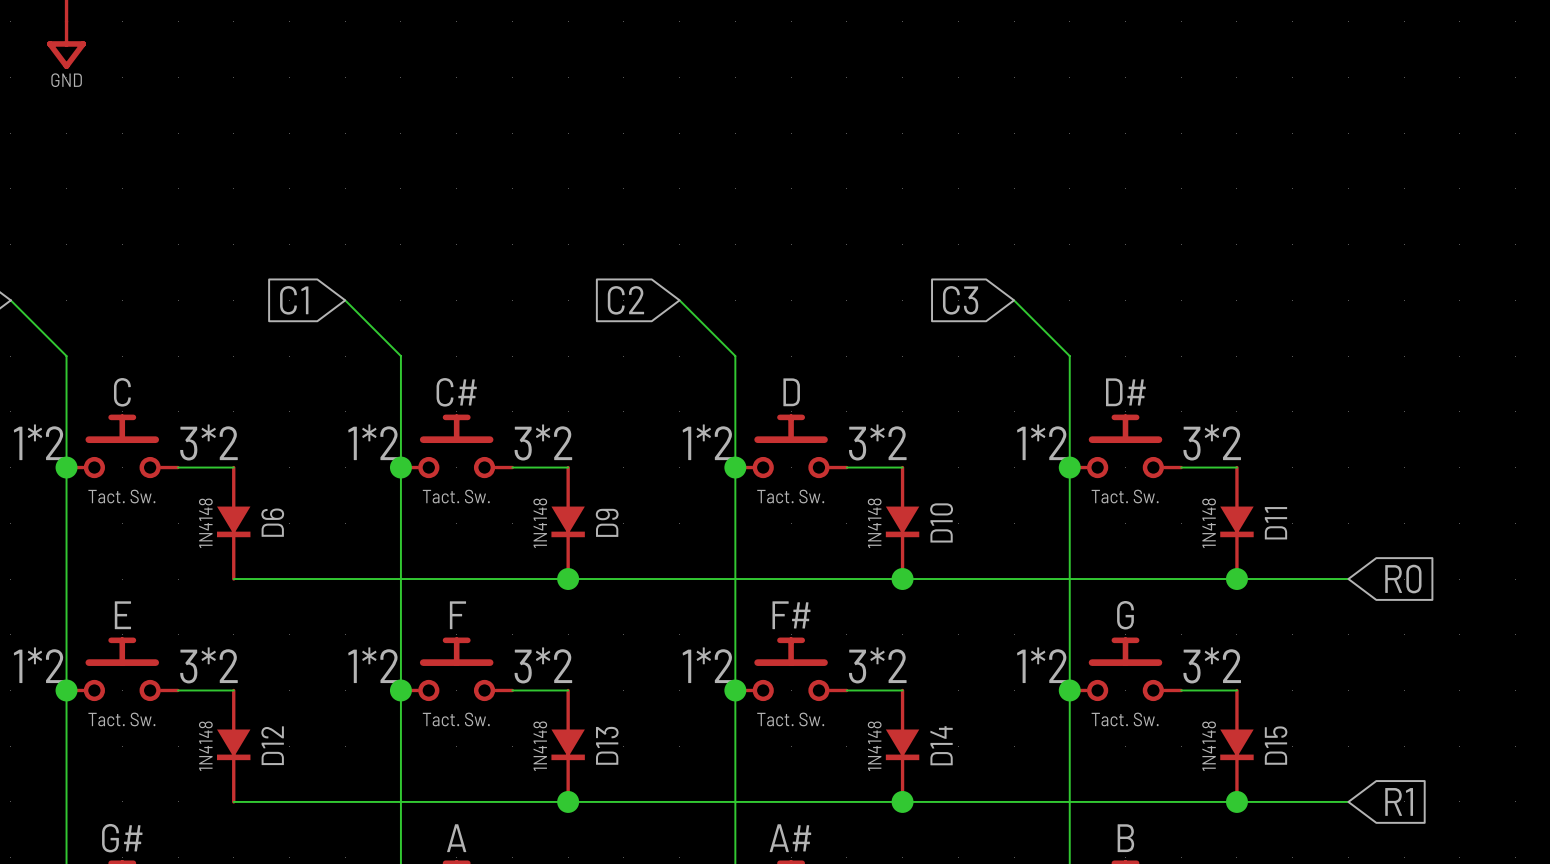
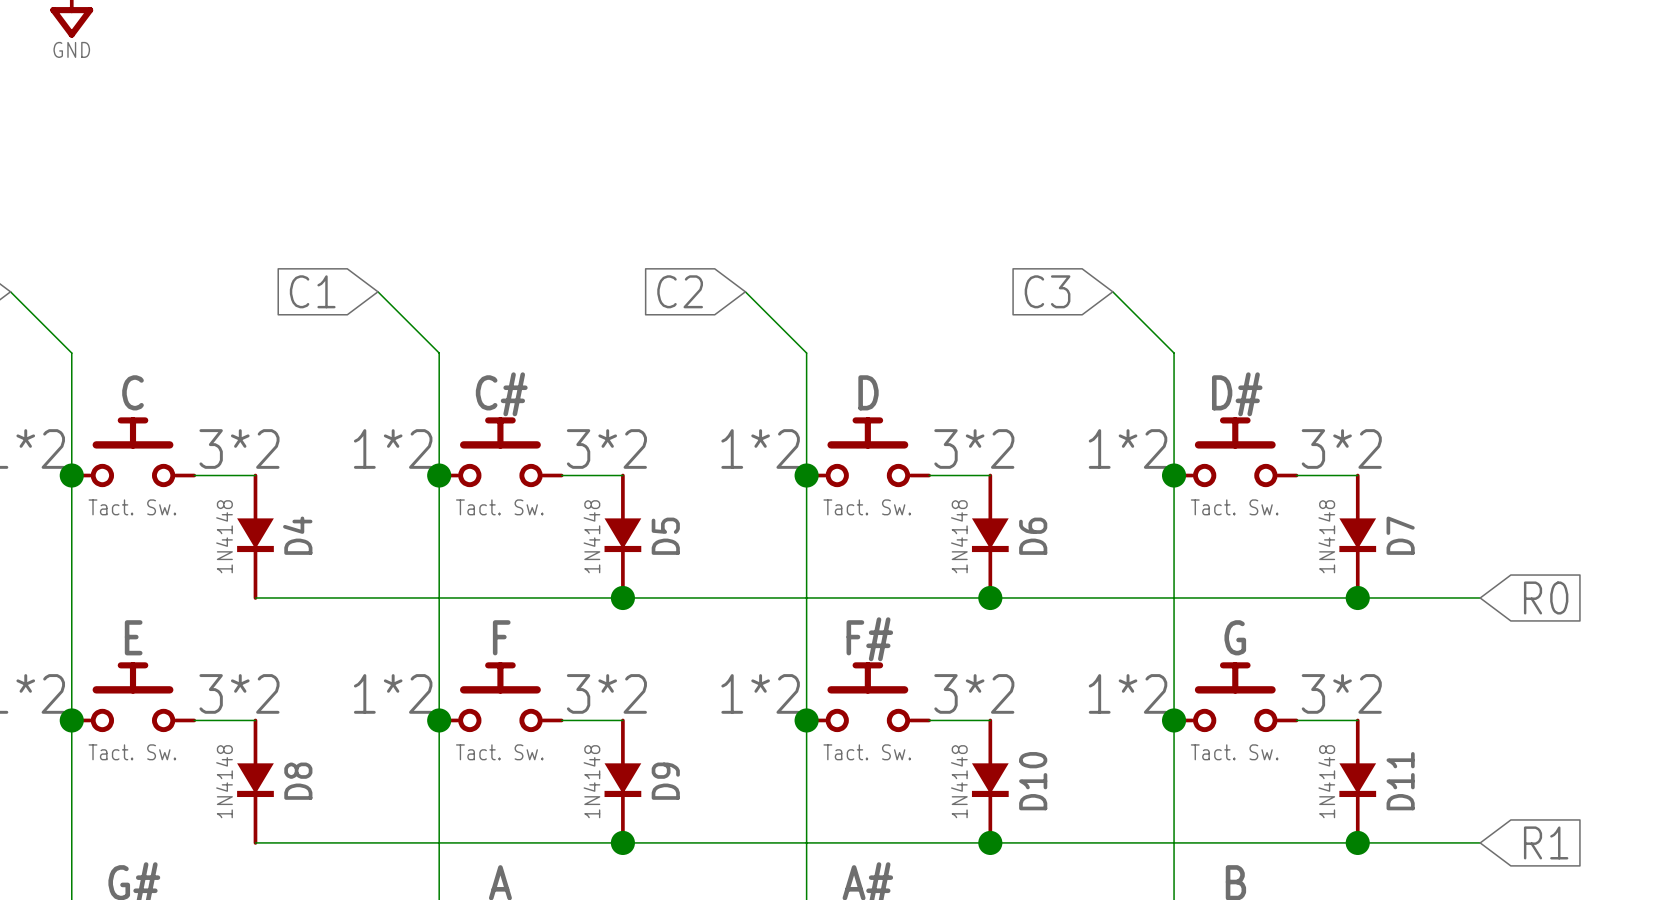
D6 name: D6 (272, 522) -> D4 (297, 535)
D9 name: D9 (607, 522) -> D5 (665, 536)
D10 name: D10 (941, 522) -> D6 (1033, 536)
D11 name: D11 (1275, 523) -> D7 (1400, 535)
D12 name: D12 (272, 745) -> D8 (298, 781)
D13 name: D13 (607, 745) -> D9 (665, 781)
D14 name: D14 (941, 745) -> D10 (1033, 781)
D15 name: D15 (1276, 745) -> D11 (1400, 781)

